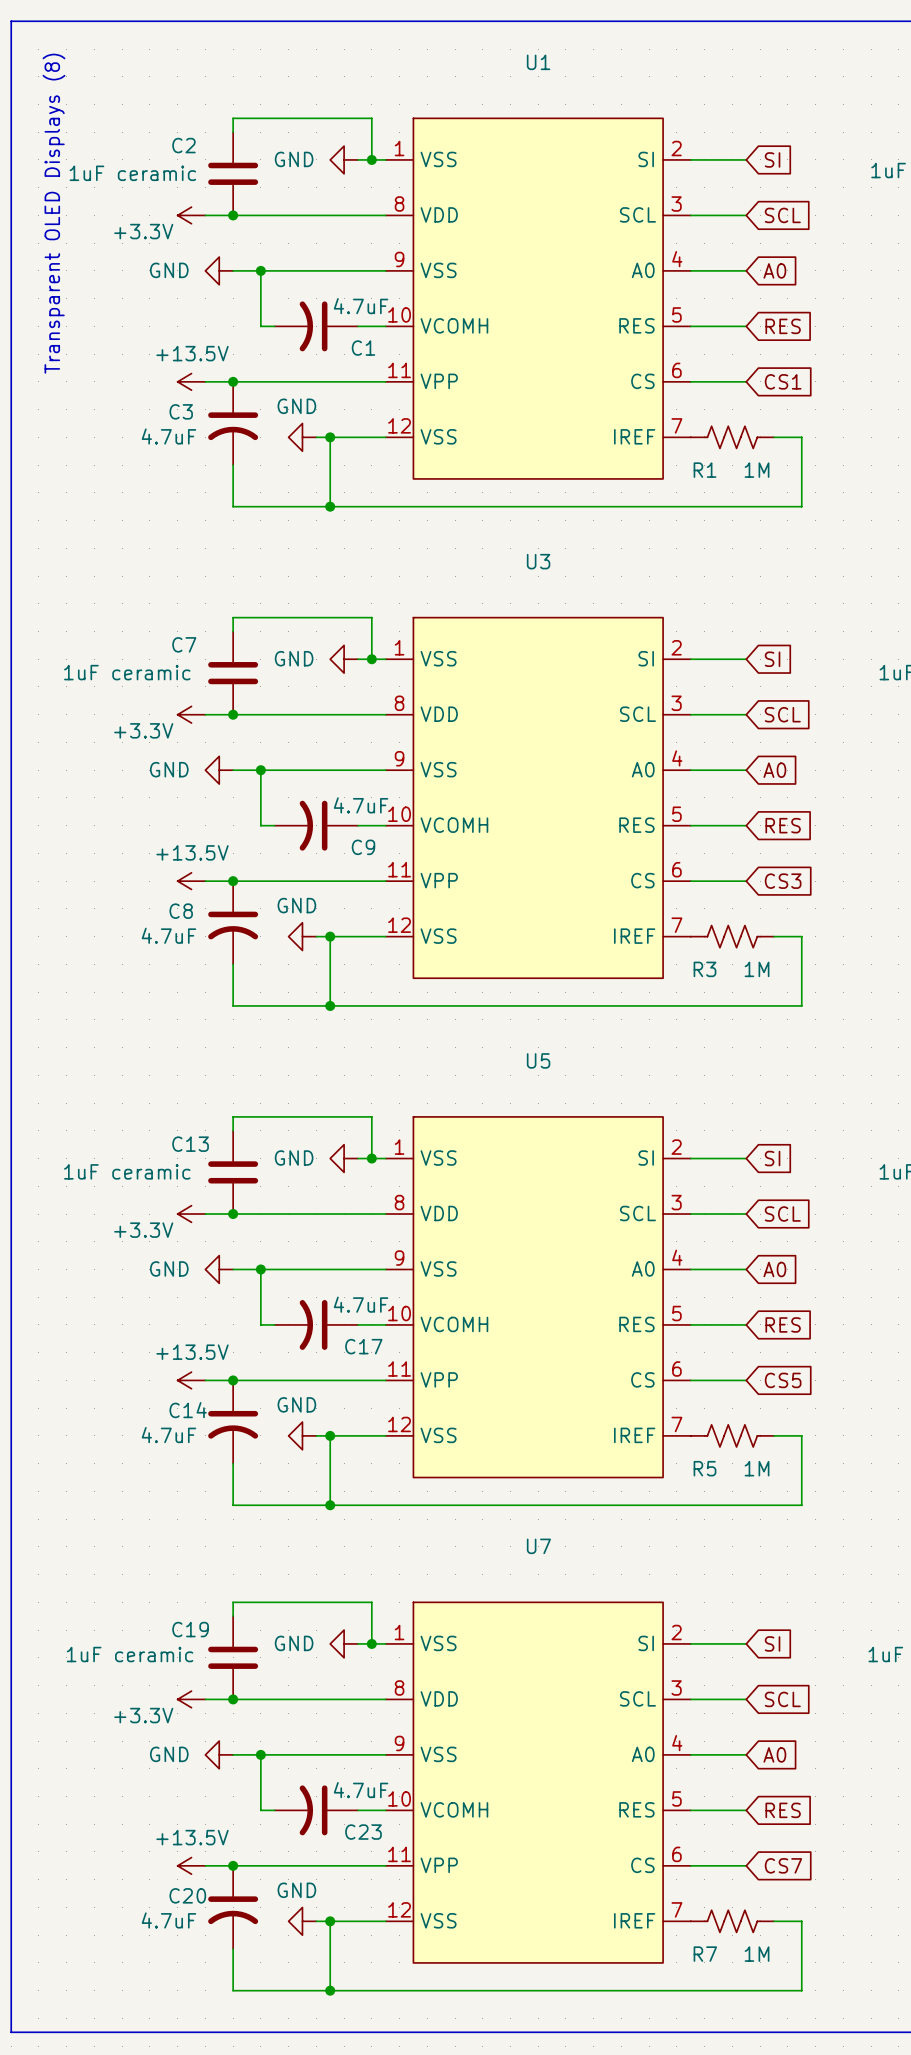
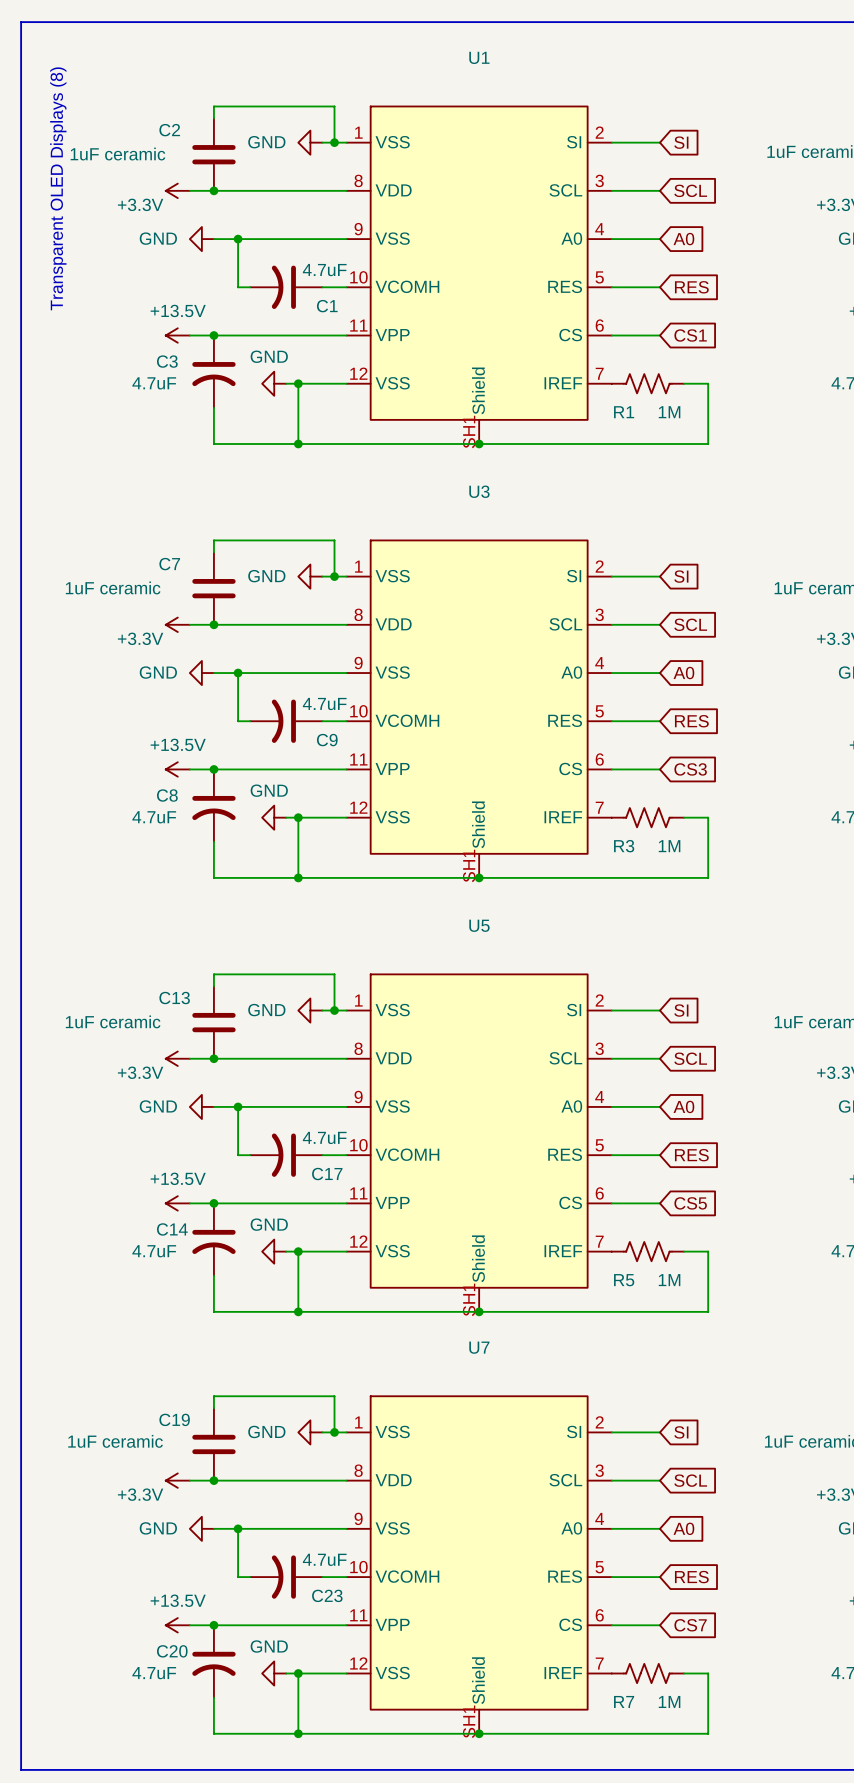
U1 symbol: [385, 118, 691, 479] -> [346, 106, 612, 444]
junction: none -> (479, 443)
U3 symbol: [385, 617, 691, 979] -> [346, 540, 612, 878]
junction: none -> (479, 877)
U5 symbol: [385, 1116, 691, 1478] -> [346, 974, 612, 1312]
junction: none -> (479, 1311)
U7 symbol: [385, 1602, 691, 1963] -> [346, 1396, 612, 1734]
junction: none -> (479, 1733)

